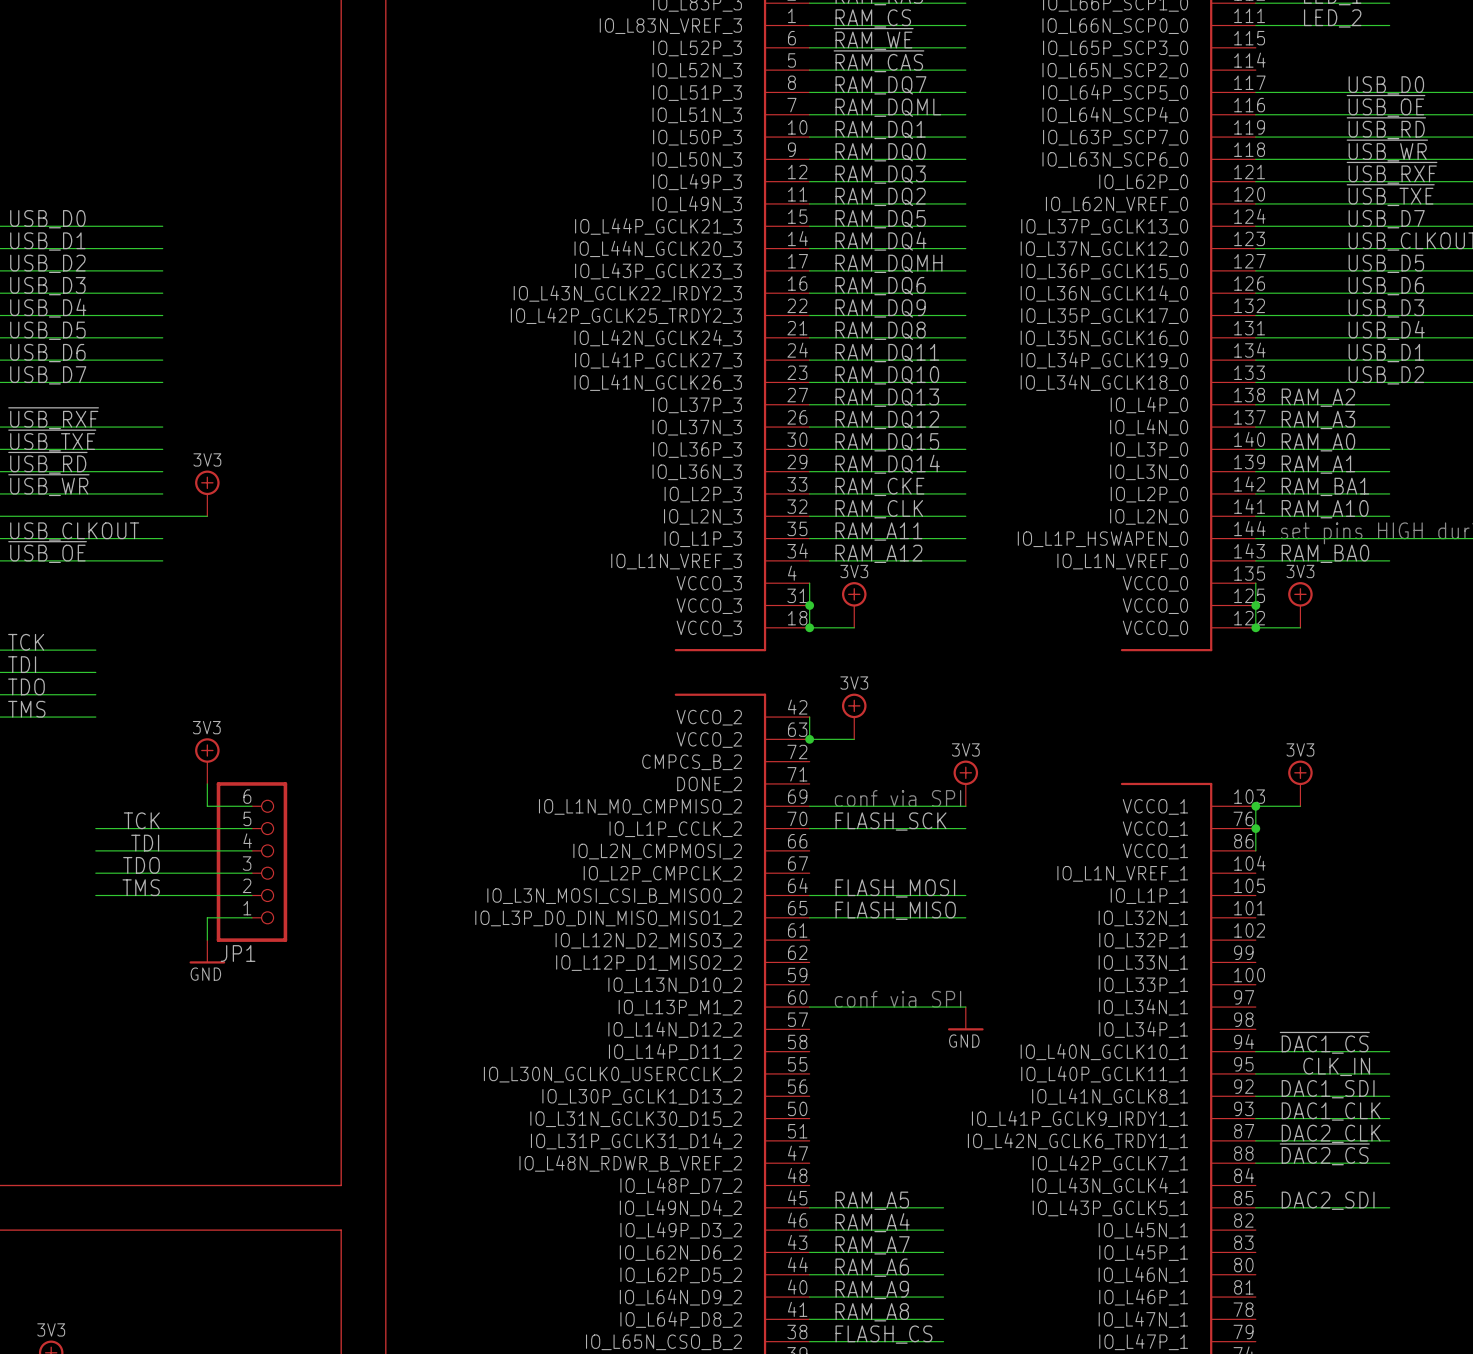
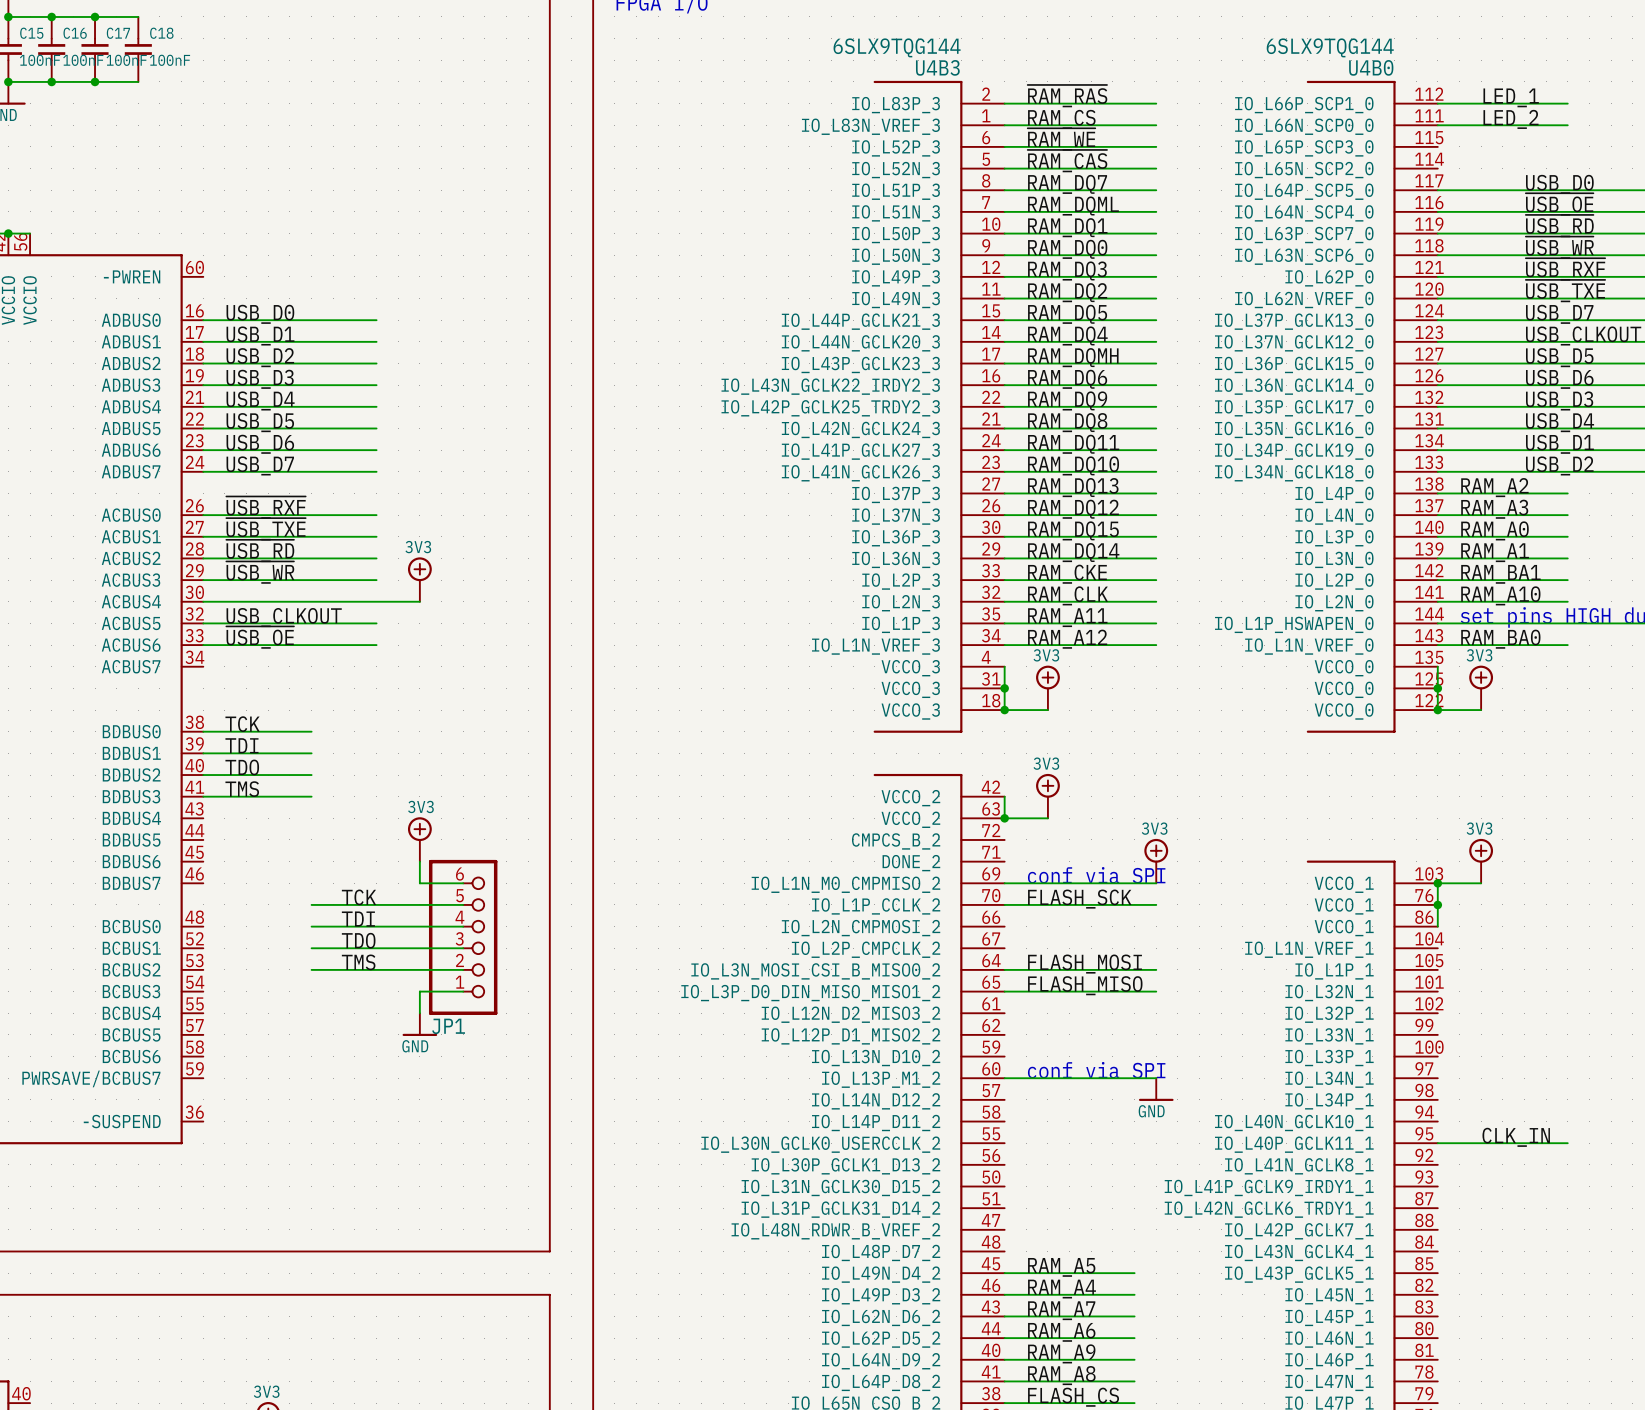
label: ~{DAC1_CS} (1324, 1042) -> none
wire: (1255, 1051) (1389, 1051) -> none
label: DAC1_SDI (1328, 1089) -> none
wire: (1255, 1096) (1389, 1096) -> none
label: DAC1_CLK (1331, 1111) -> none
wire: (1255, 1118) (1389, 1118) -> none
label: DAC2_CLK (1331, 1133) -> none
wire: (1255, 1140) (1389, 1140) -> none
label: ~{DAC2_CS} (1324, 1154) -> none
wire: (1255, 1163) (1389, 1163) -> none
label: DAC2_SDI (1328, 1200) -> none
wire: (1255, 1207) (1389, 1207) -> none

